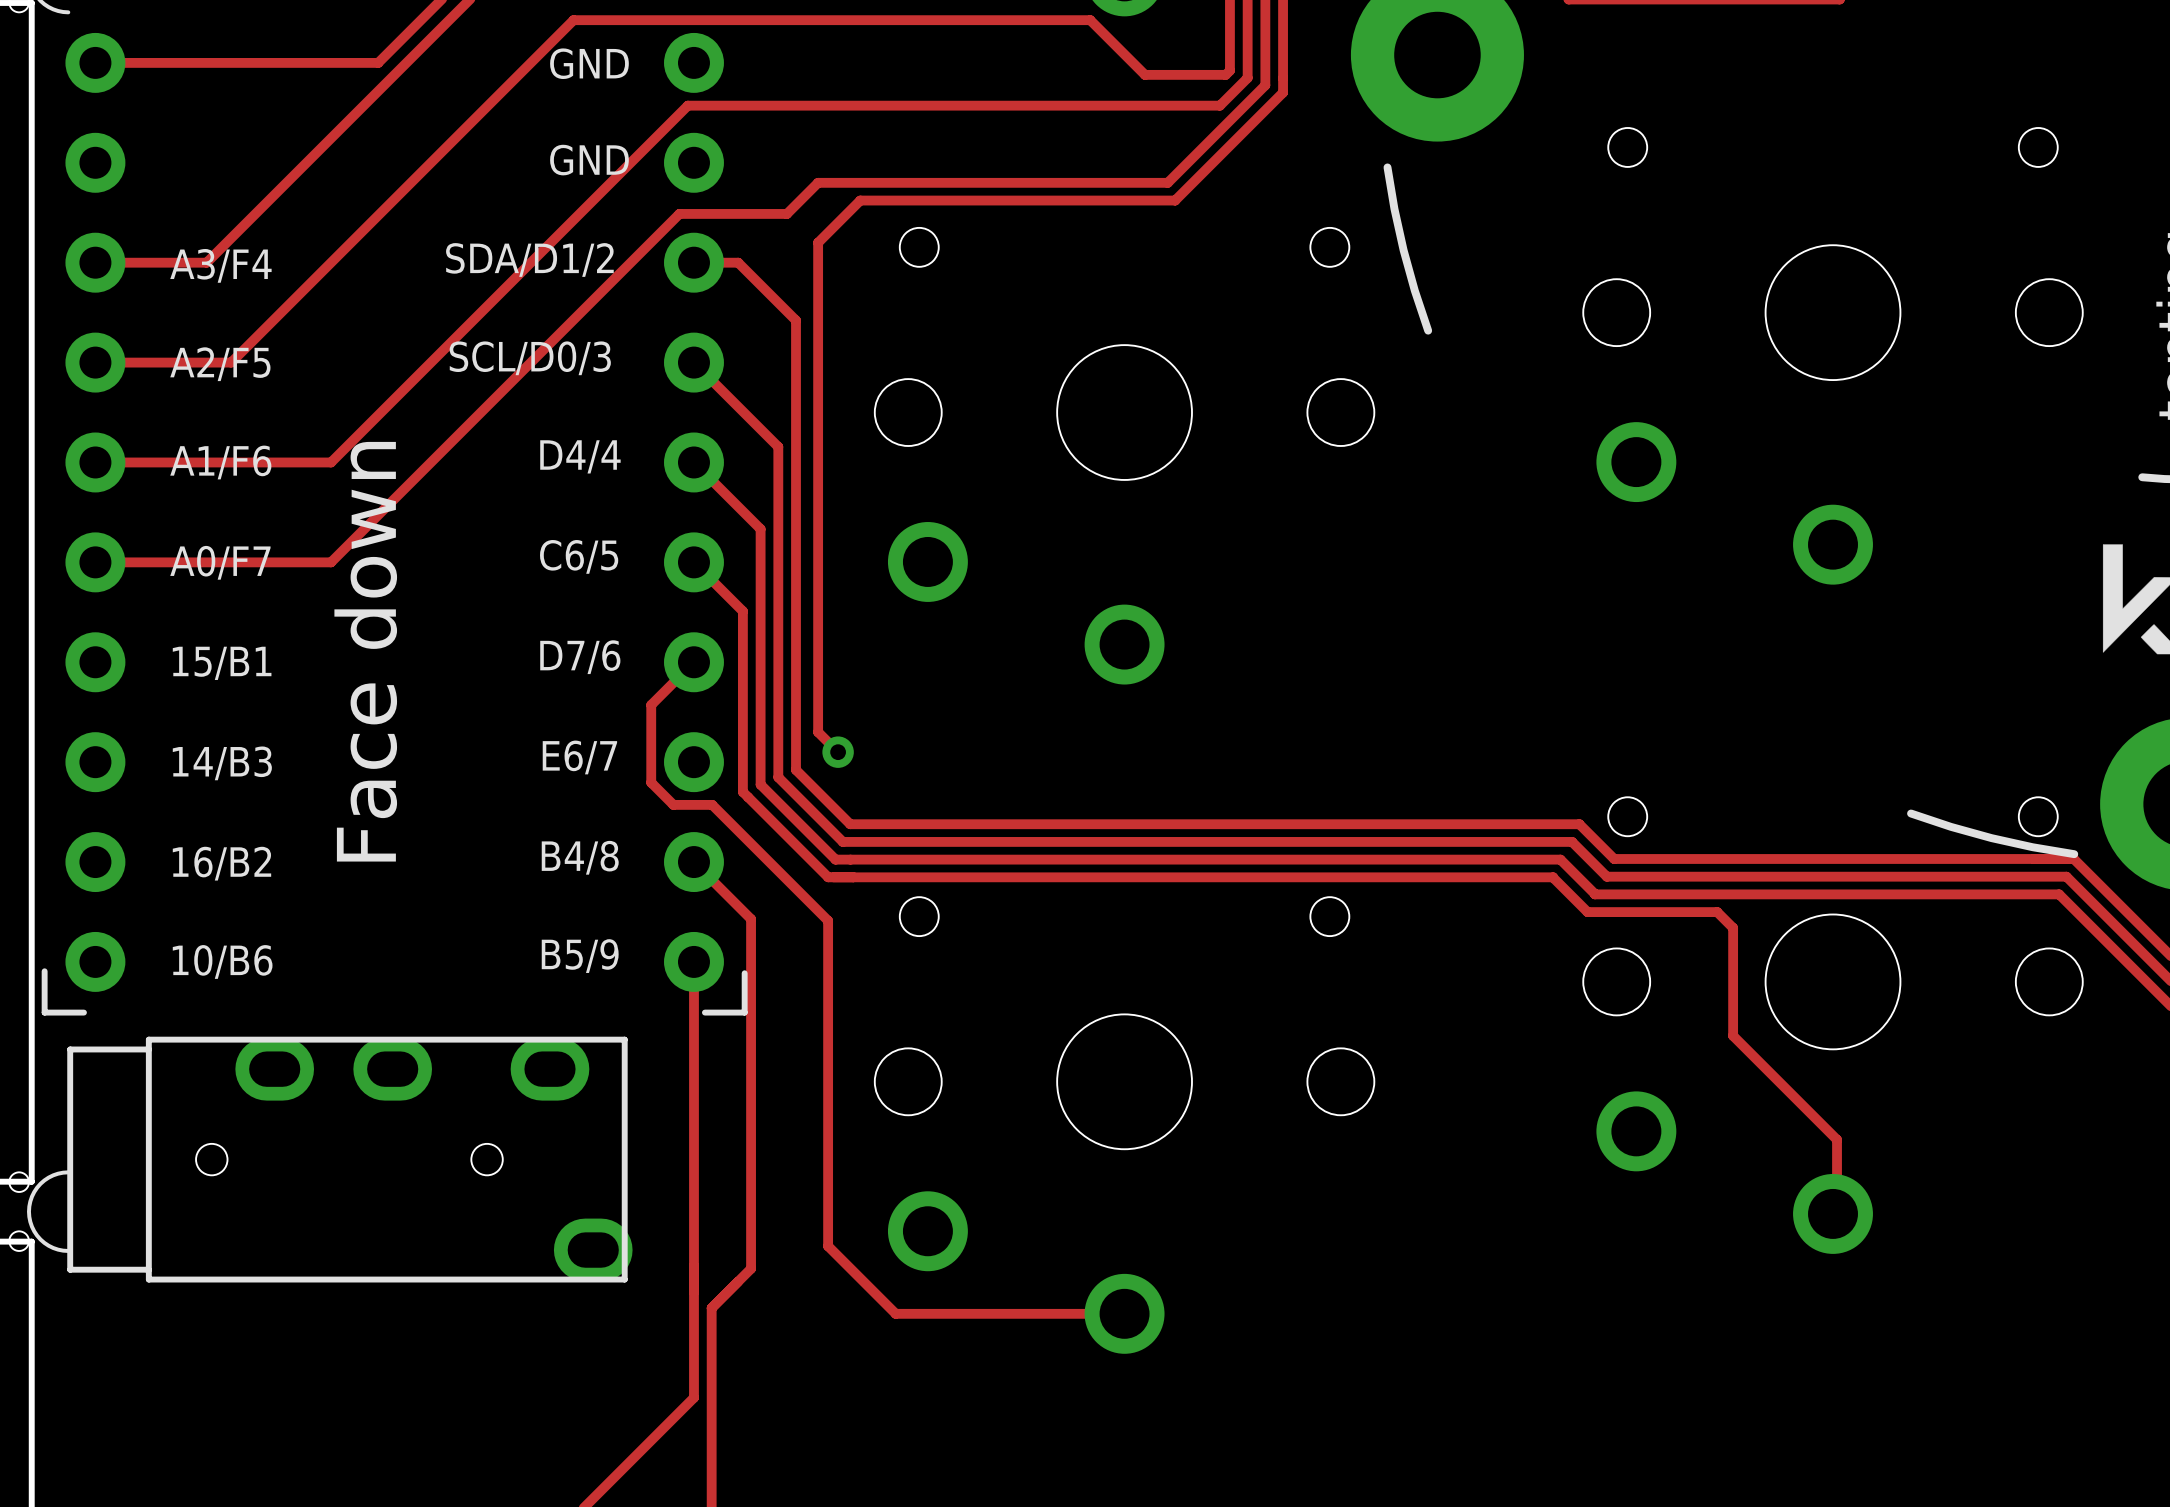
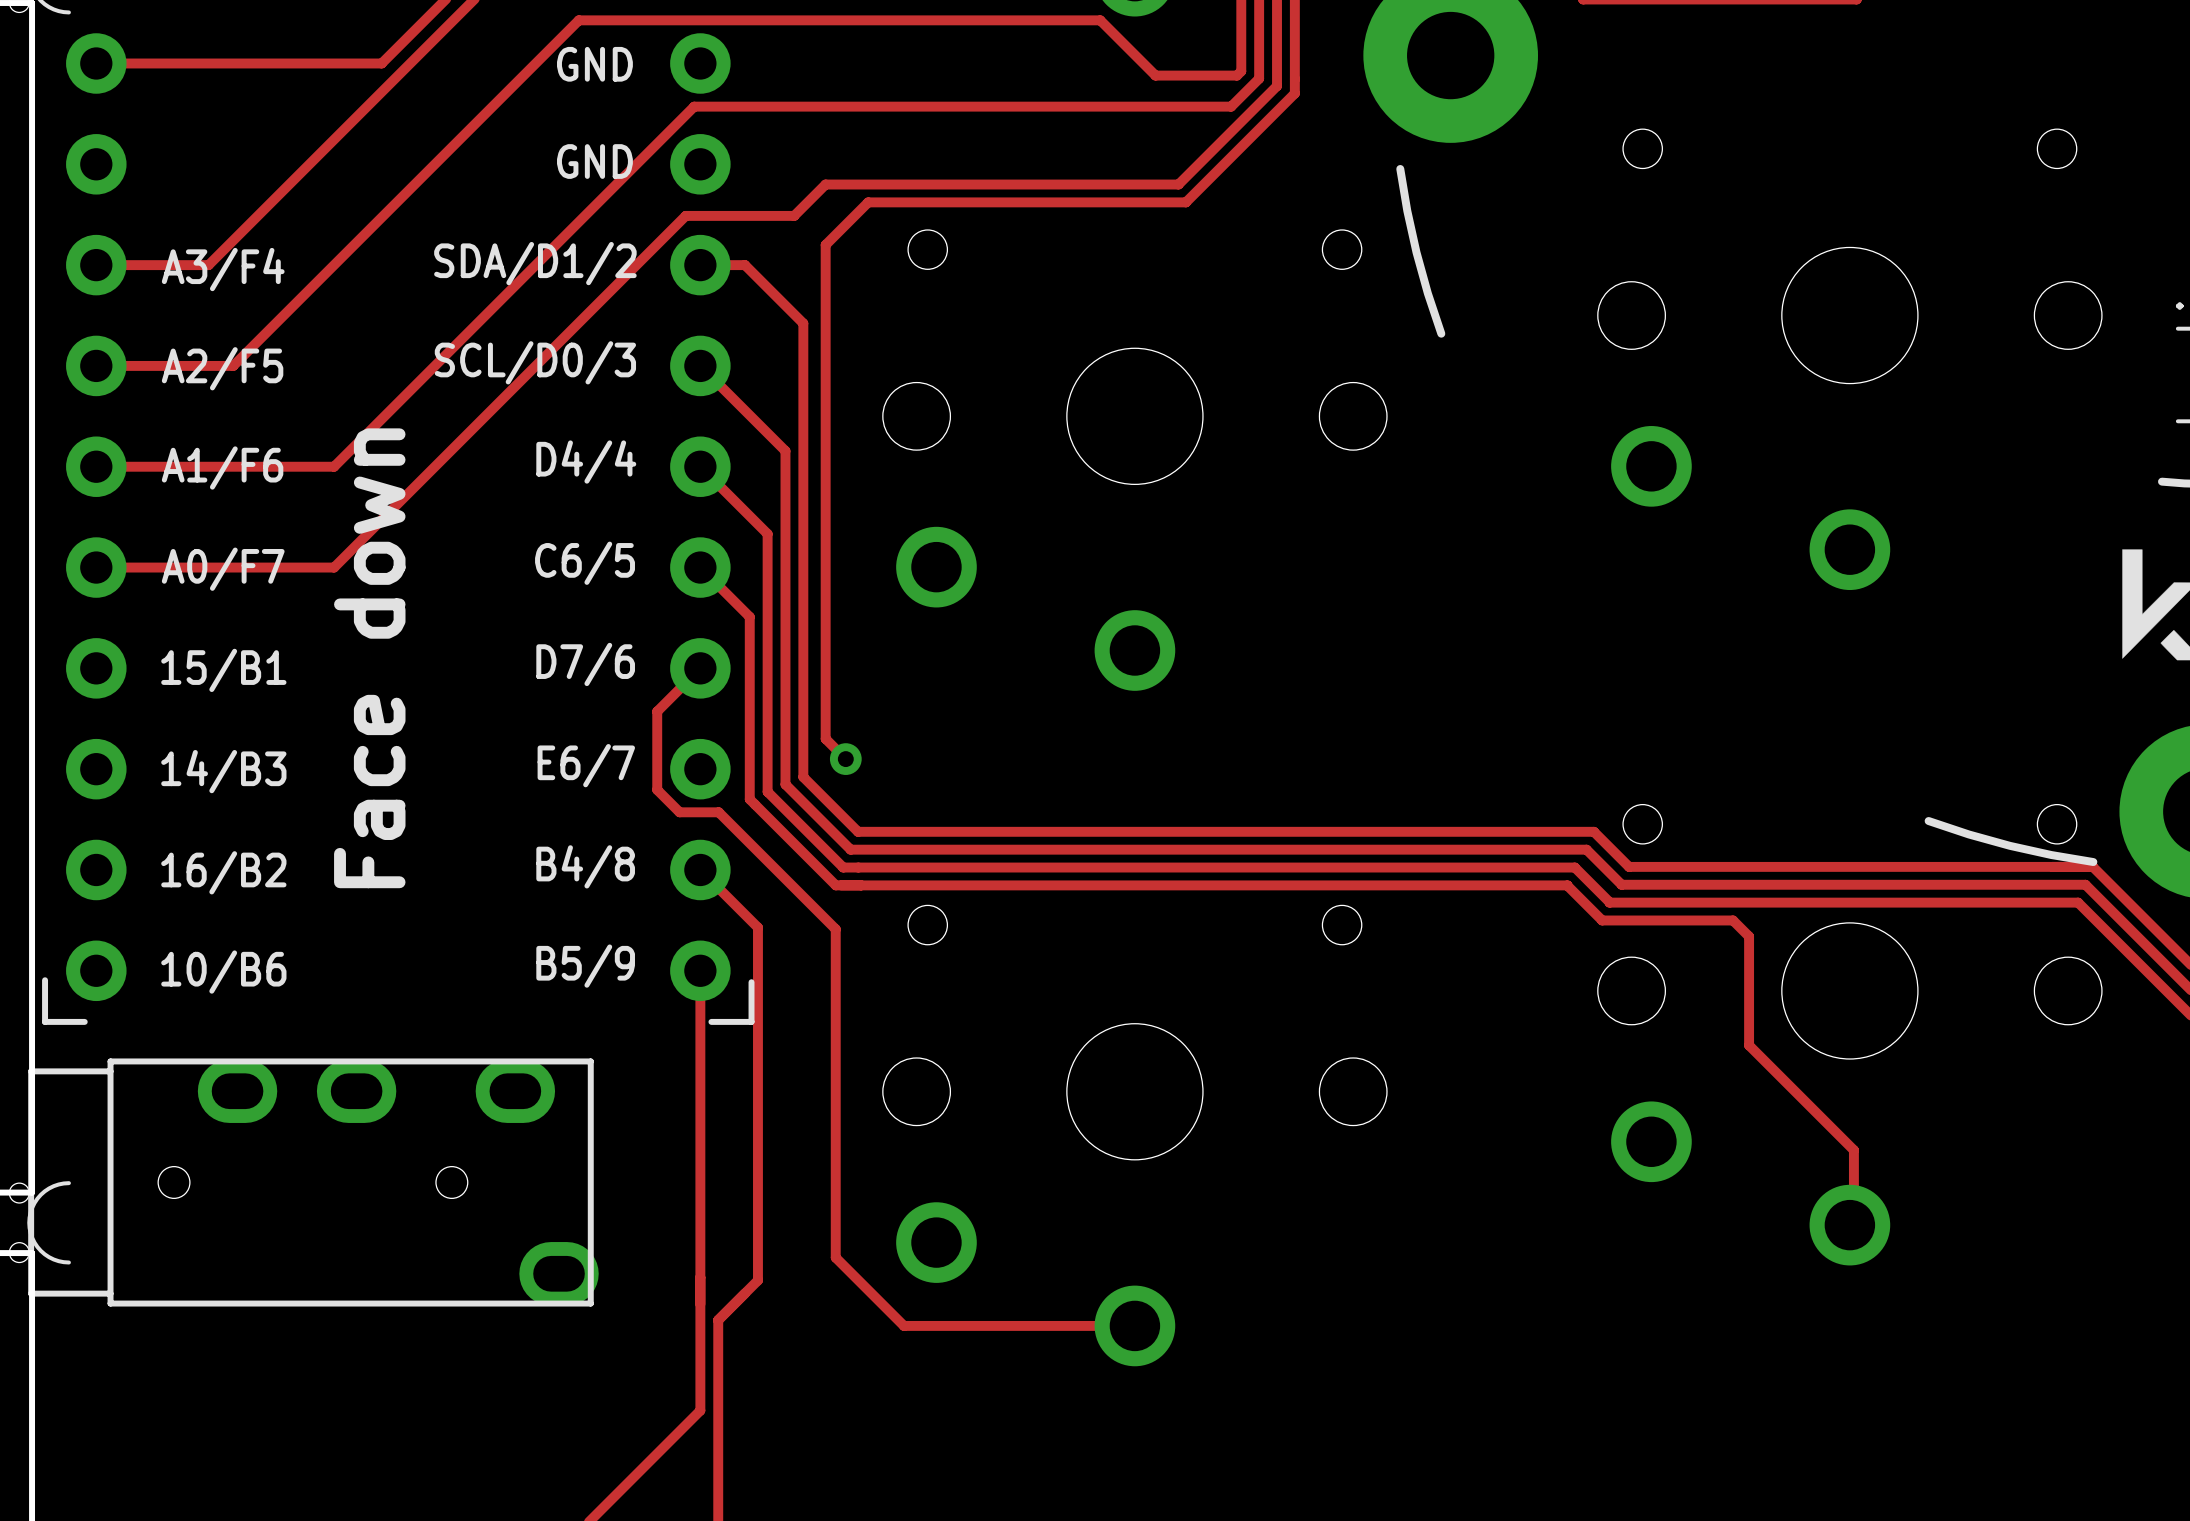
part position: (349, 1159) -> (313, 1182)

